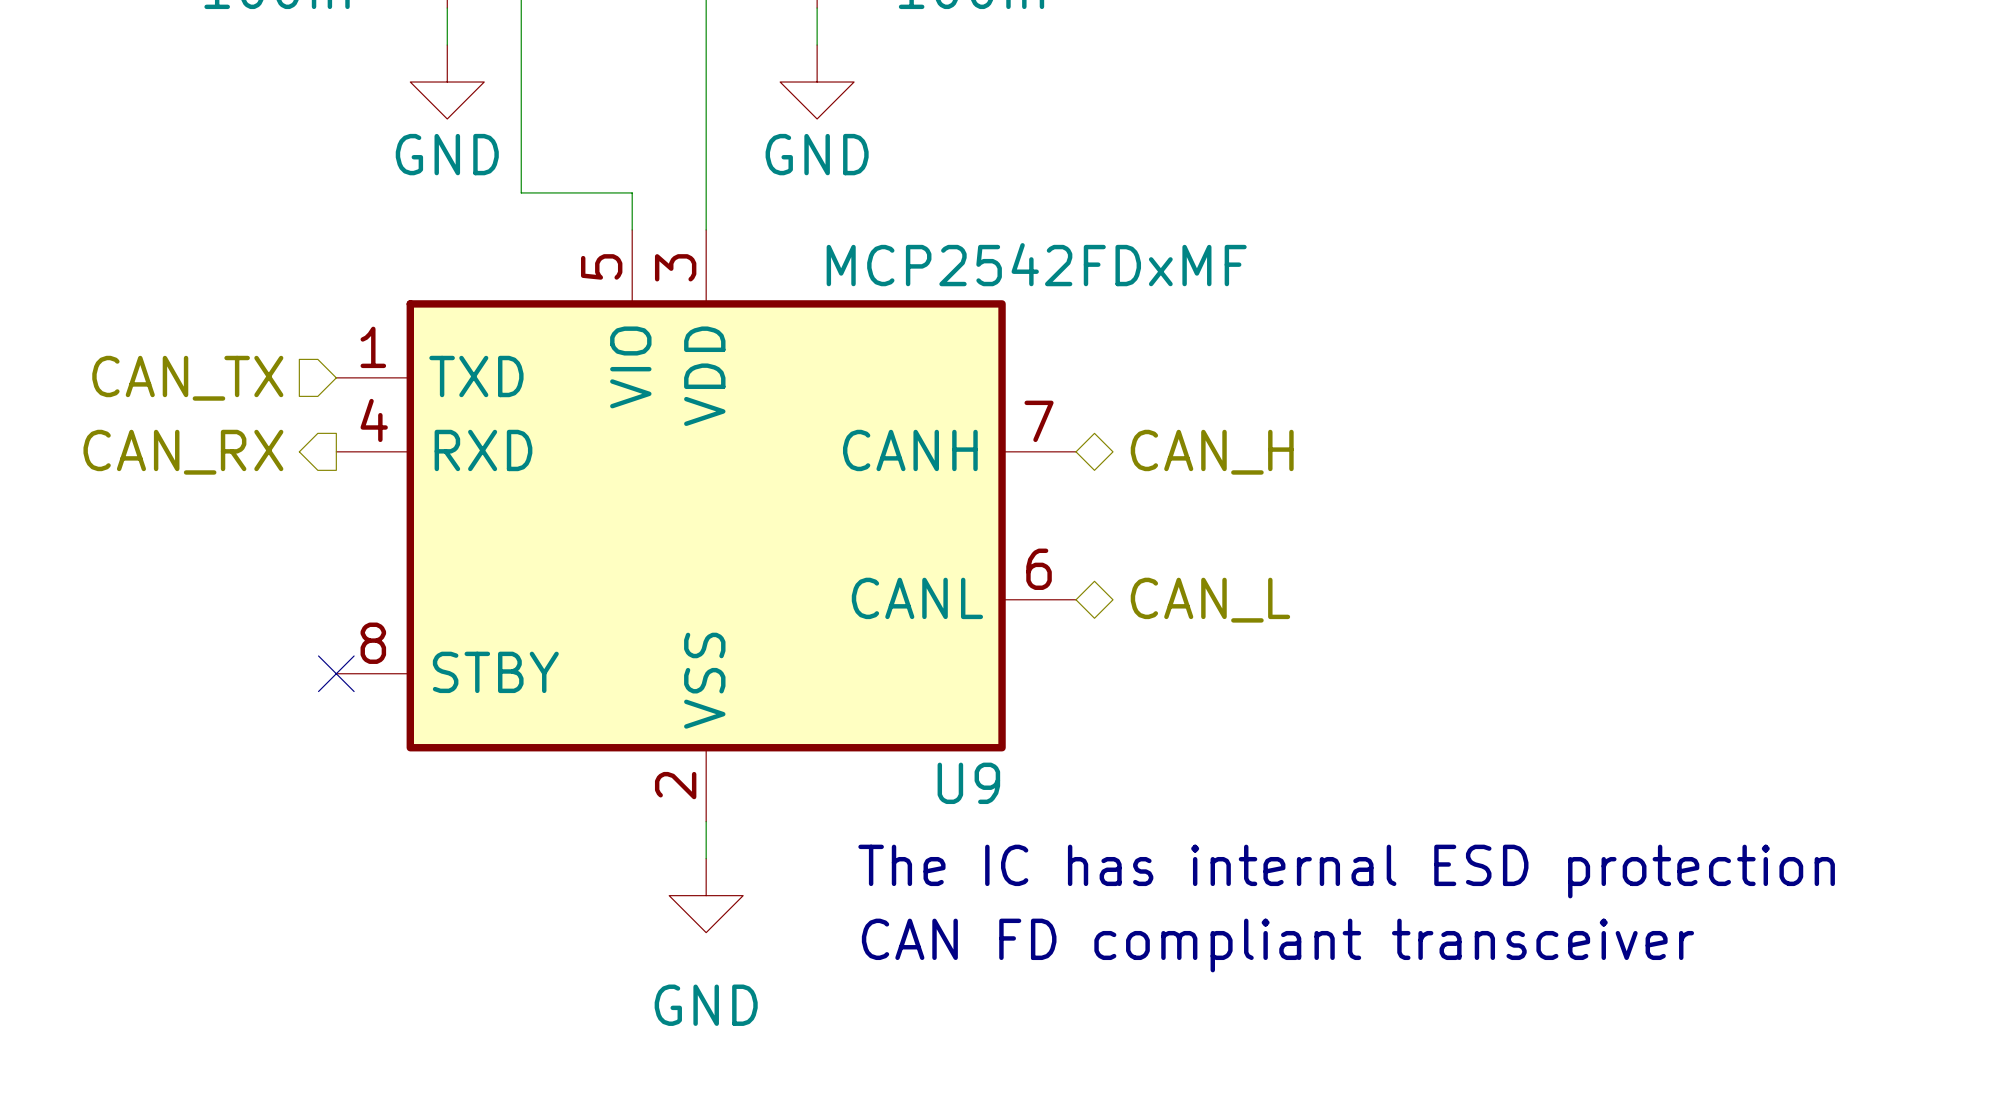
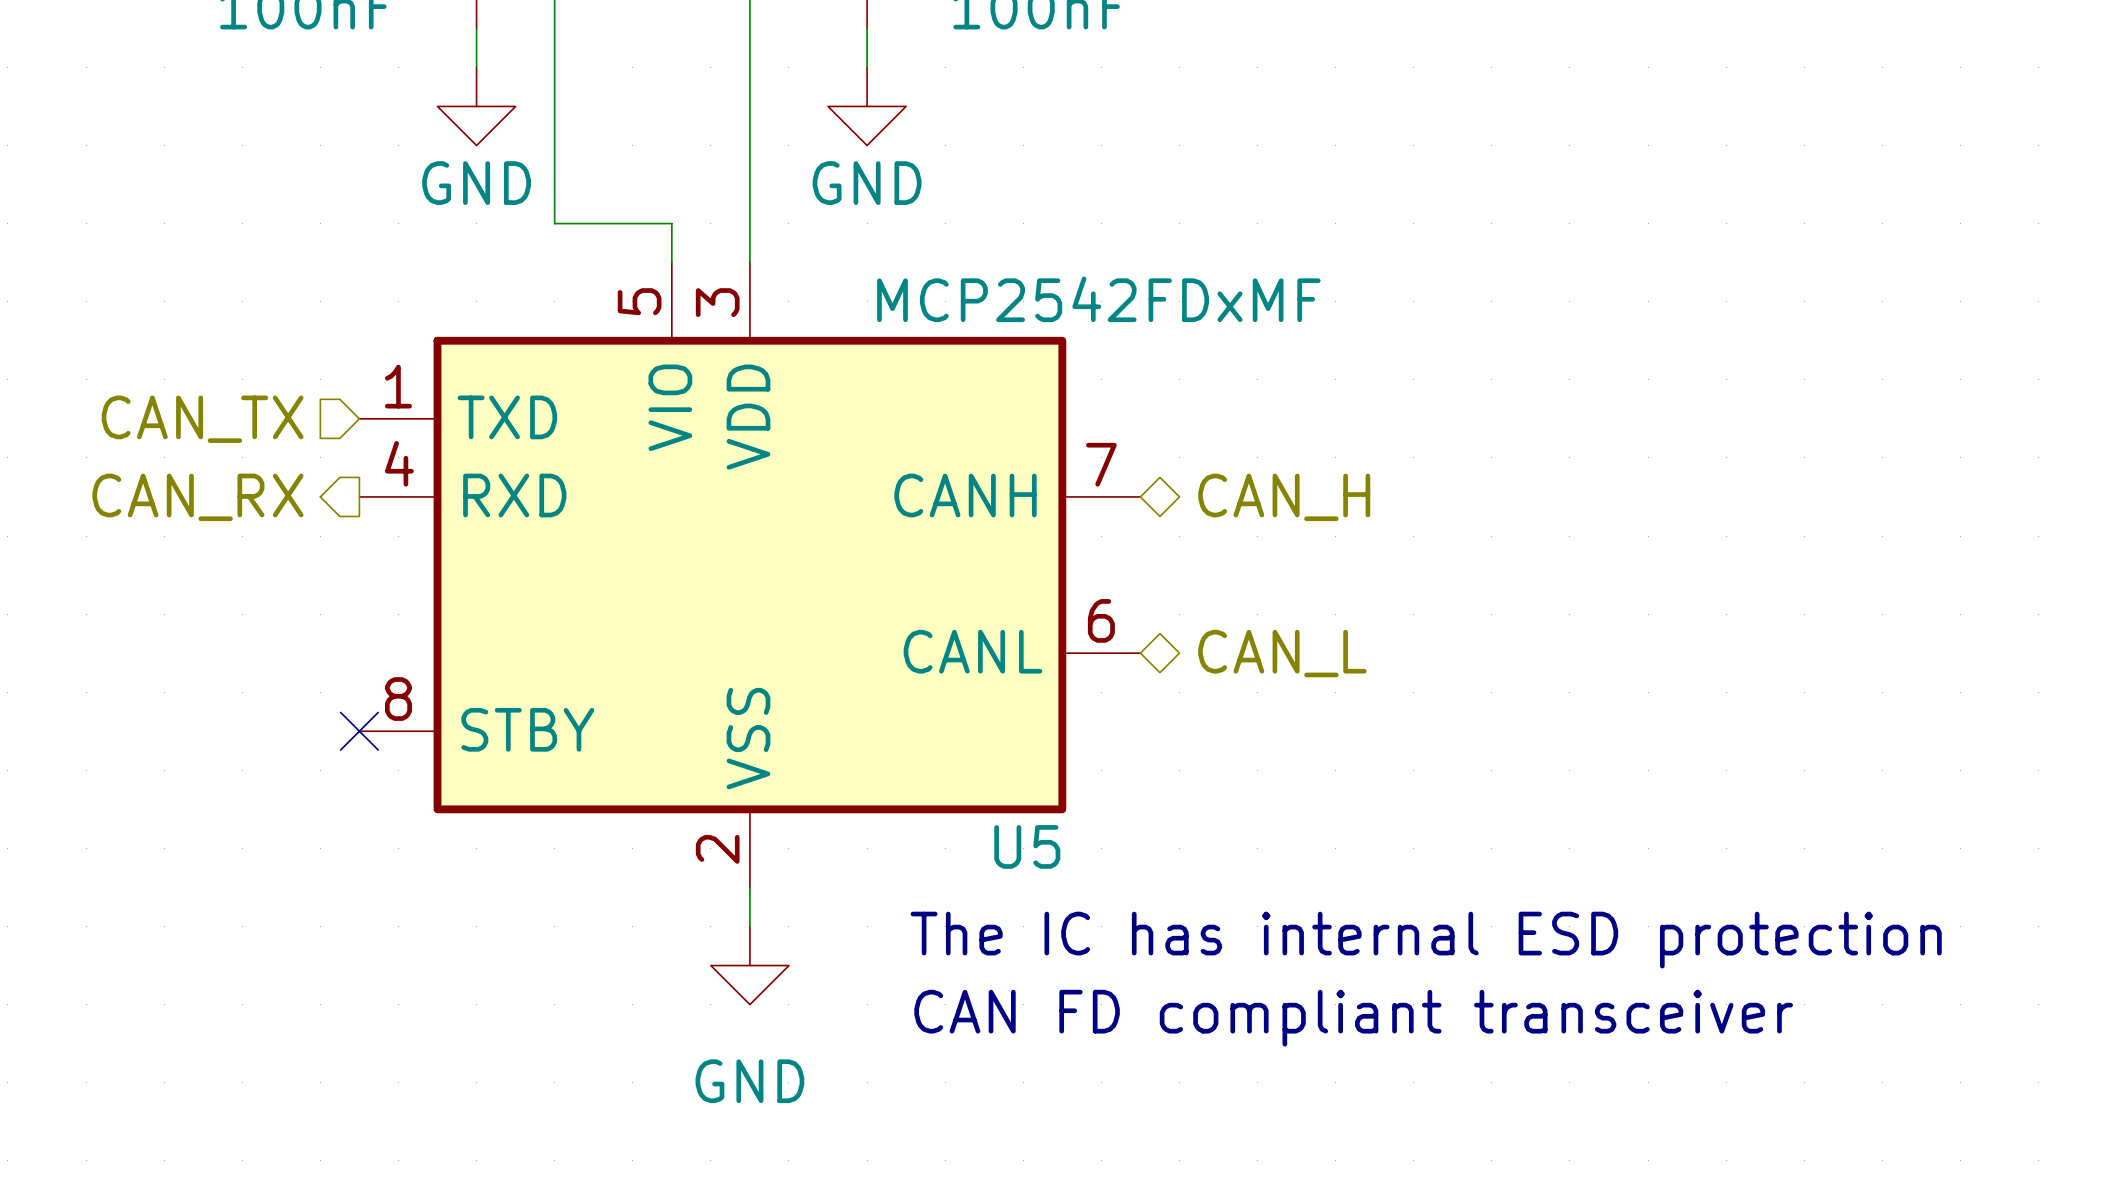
U9 name: U9 (968, 783) -> U5 (1027, 846)

